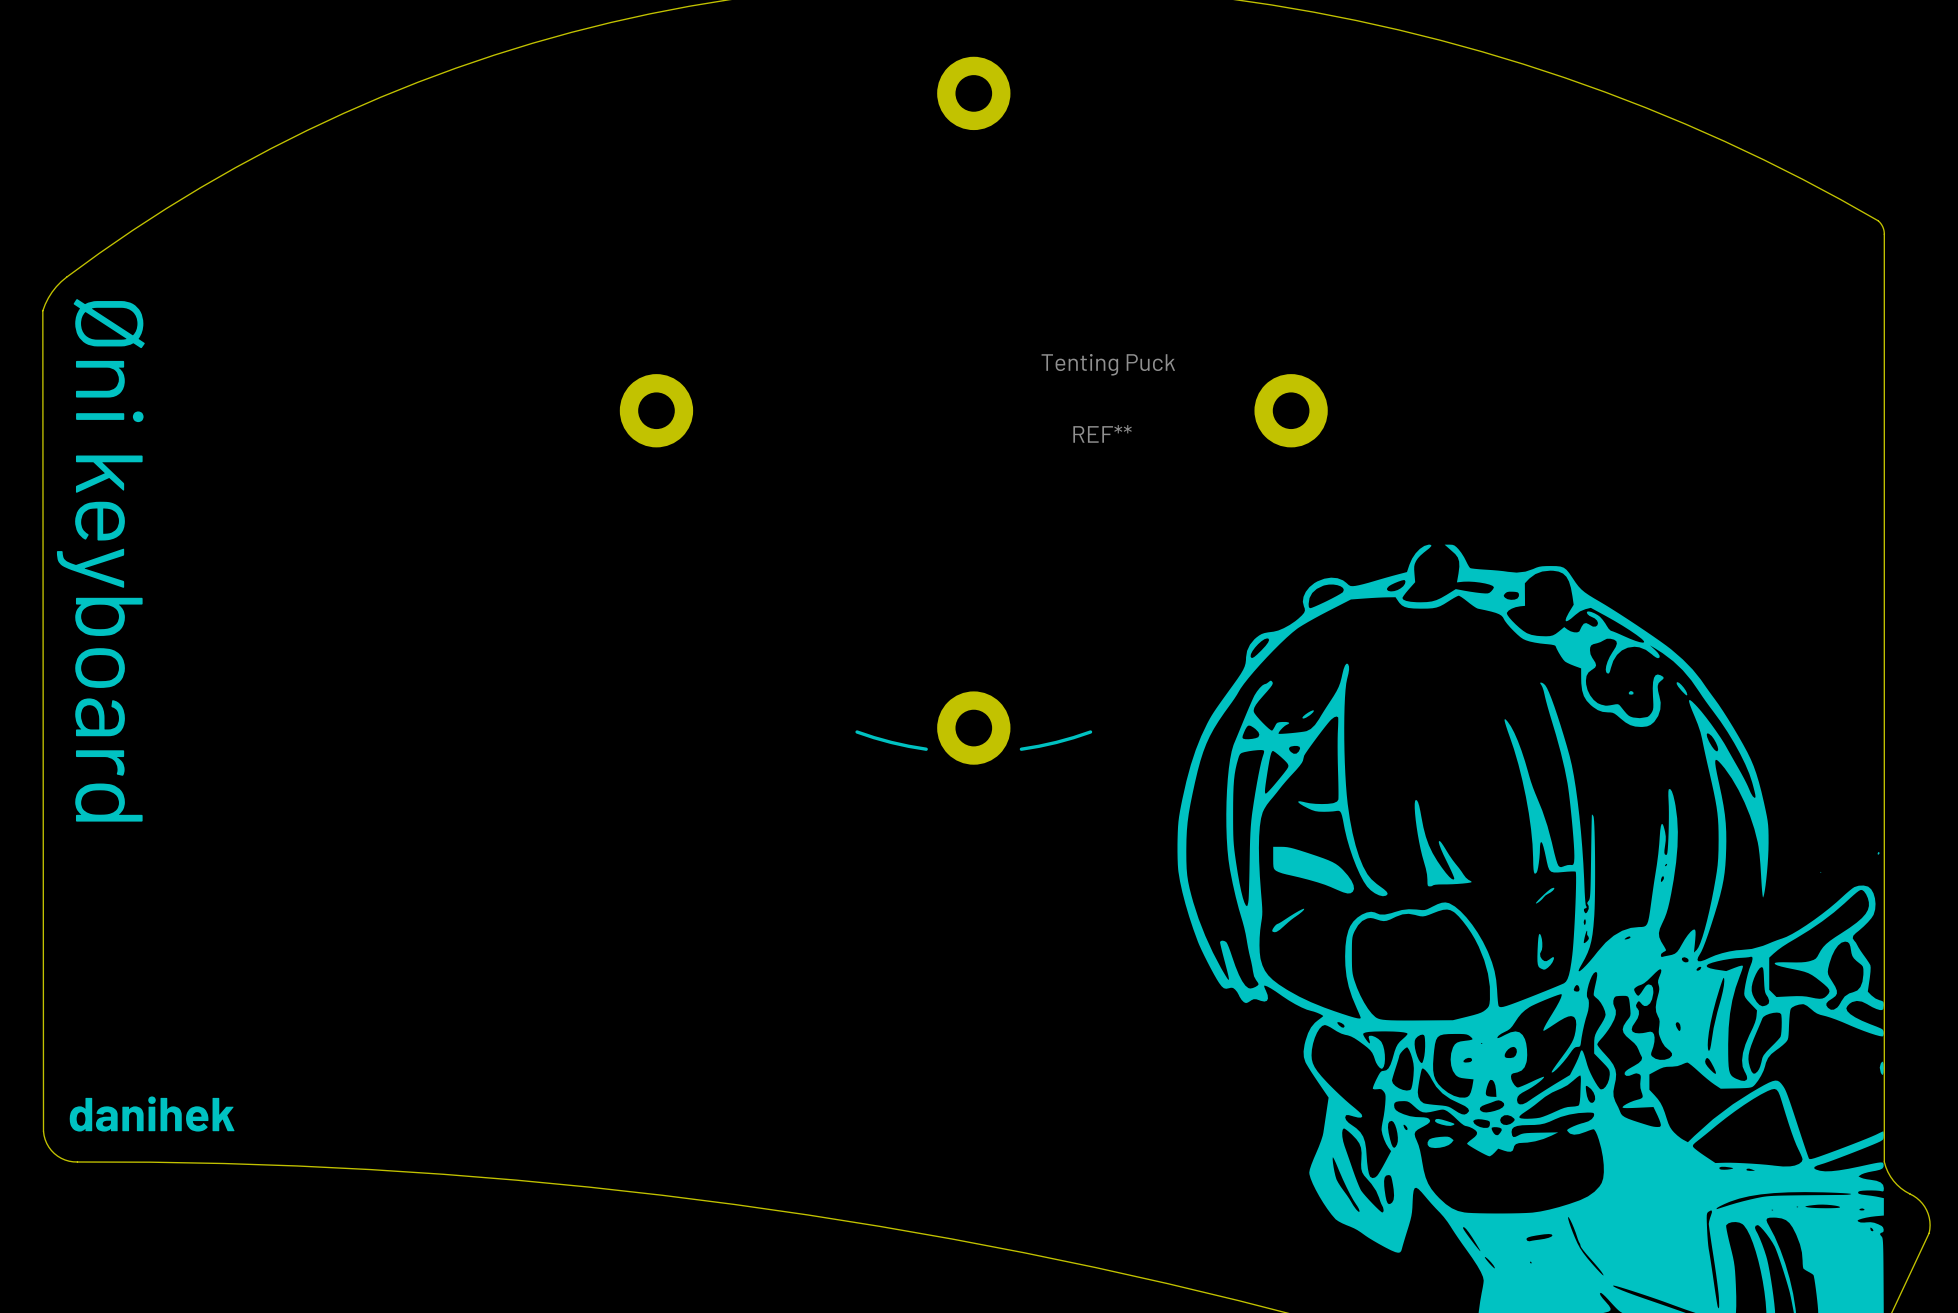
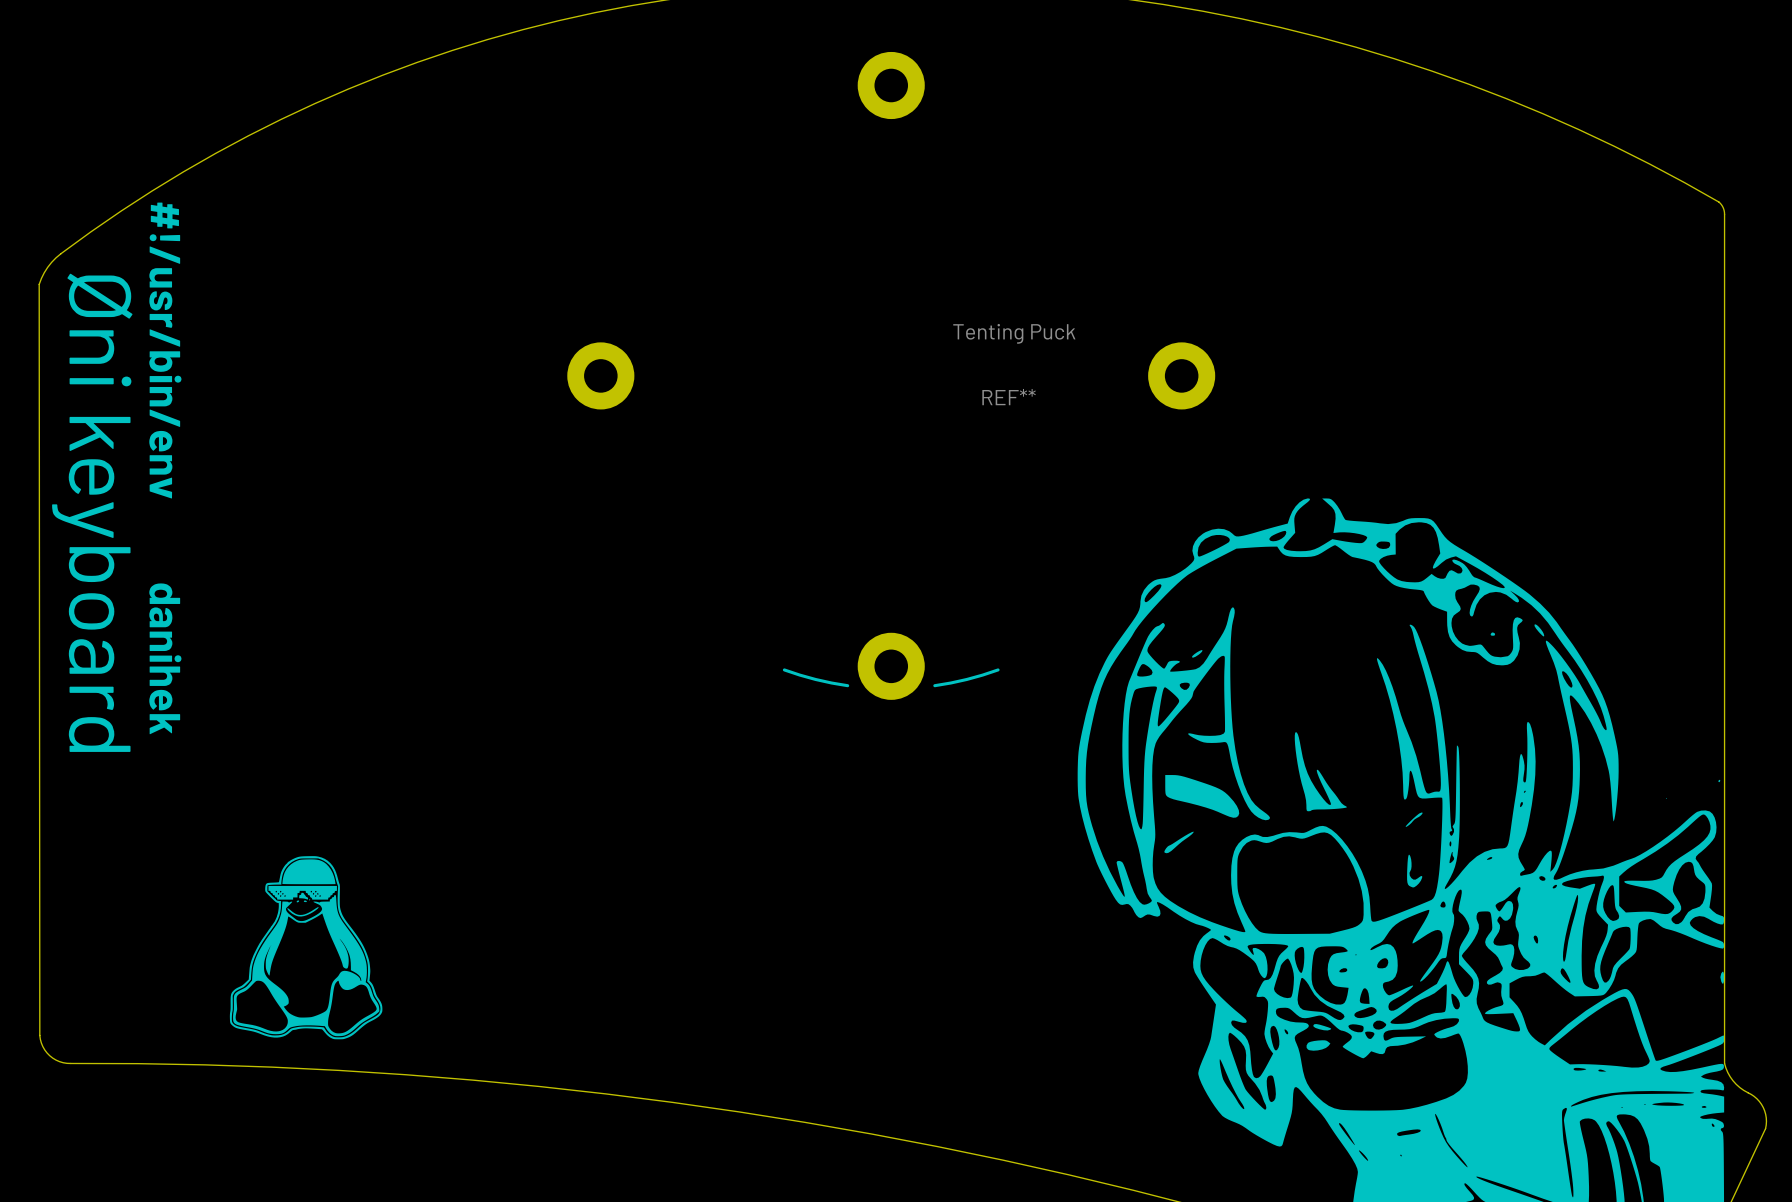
text: none -> #!/usr/bin/env (165, 350)
text: none -> danihek (165, 658)
drawing: none -> [229, 856, 383, 1040]
text: danihek (152, 1114) -> none

